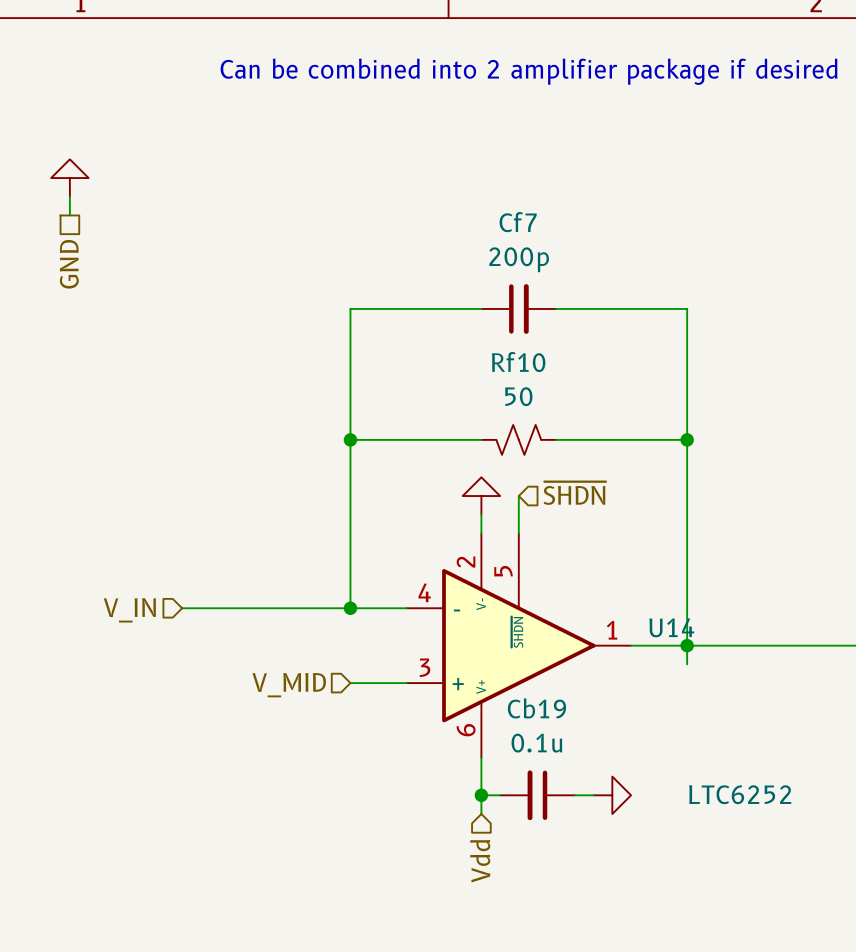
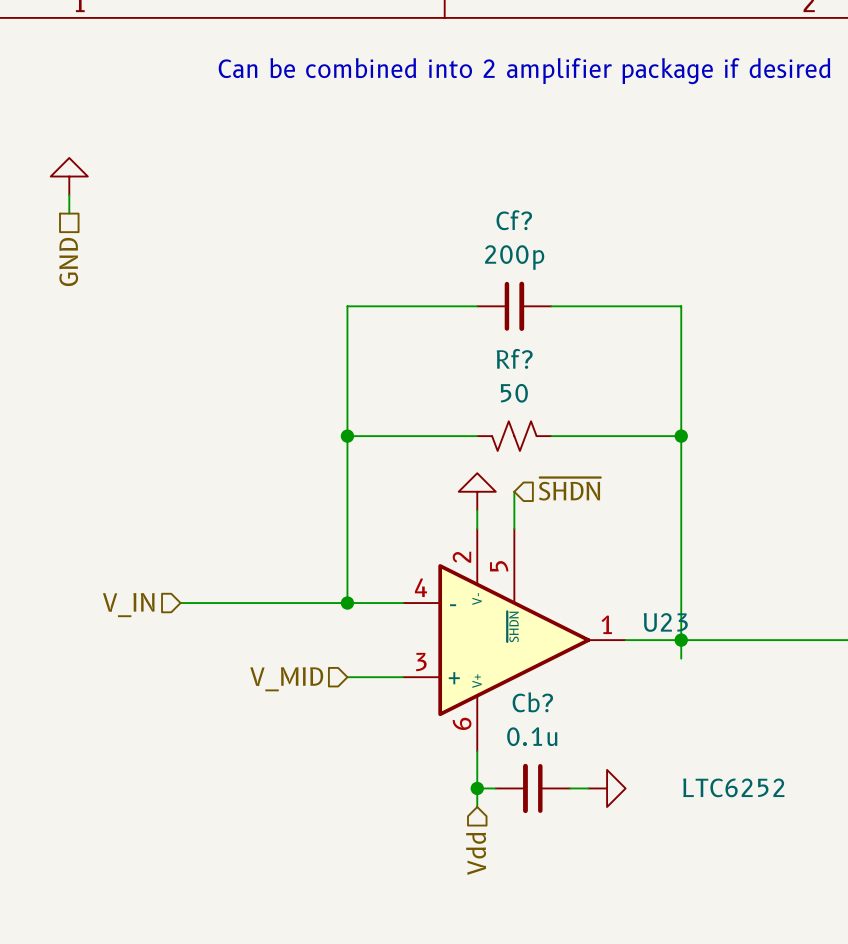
Cf7 name: Cf7 (518, 222) -> Cf? (514, 220)
Rf10 name: Rf10 (518, 362) -> Rf? (514, 358)
U14 name: U14 (671, 627) -> U23 (665, 622)
Cb19 name: Cb19 (536, 708) -> Cb? (532, 702)

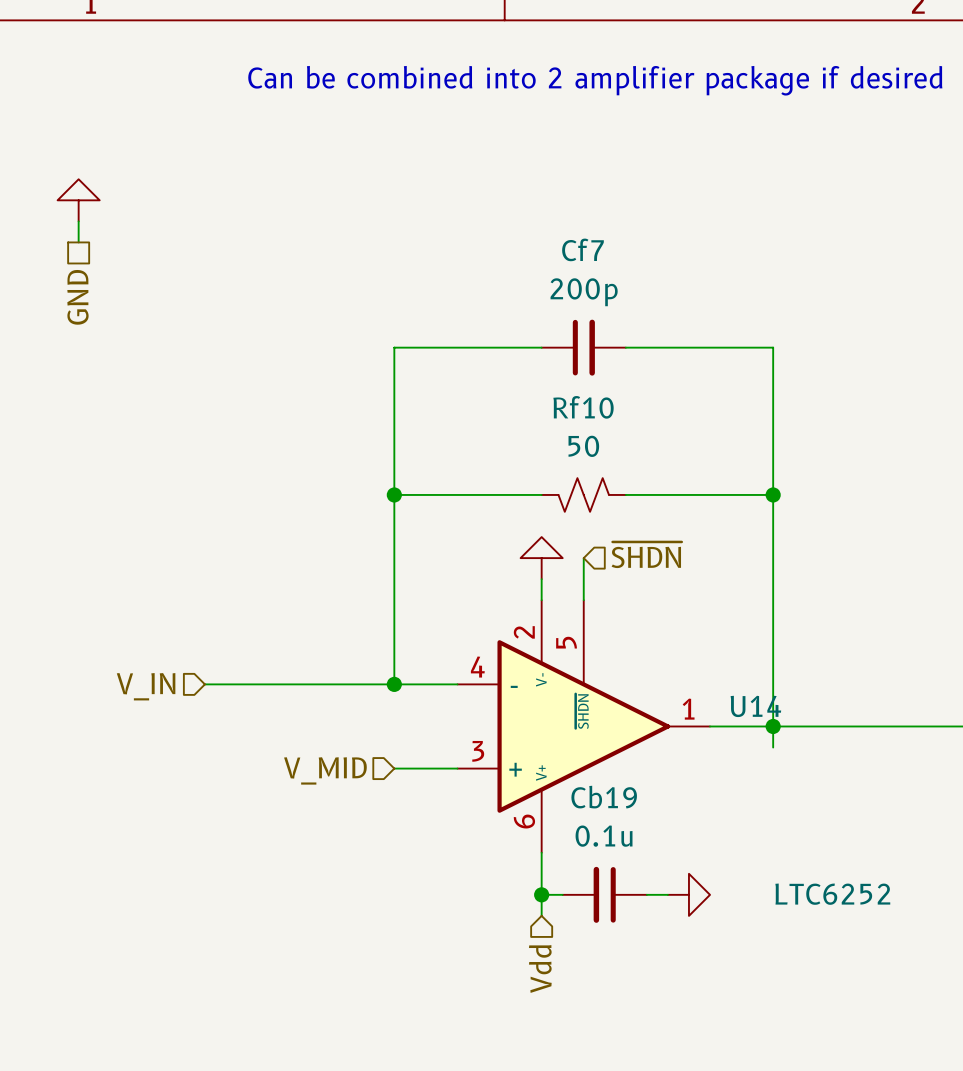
Cf? name: Cf? (514, 220) -> Cf7 (582, 249)
Rf? name: Rf? (514, 358) -> Rf10 (583, 407)
U23 name: U23 (665, 622) -> U14 (755, 706)
Cb? name: Cb? (532, 702) -> Cb19 (604, 797)

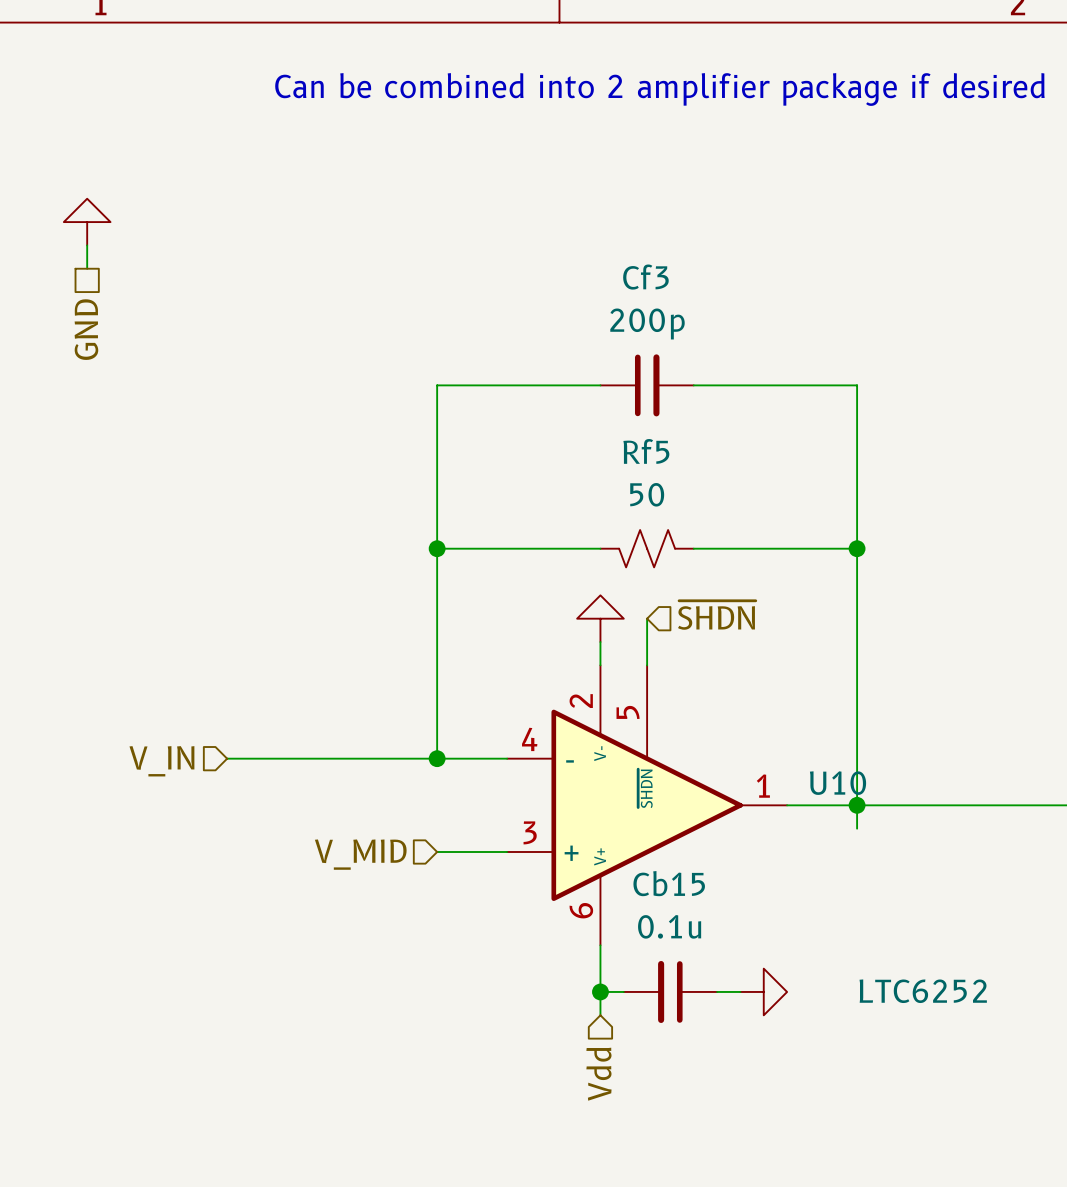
Cf7 name: Cf7 (582, 249) -> Cf3 (645, 277)
Rf10 name: Rf10 (583, 407) -> Rf5 (646, 451)
U14 name: U14 (755, 706) -> U10 (838, 783)
Cb19 name: Cb19 (604, 797) -> Cb15 (669, 883)

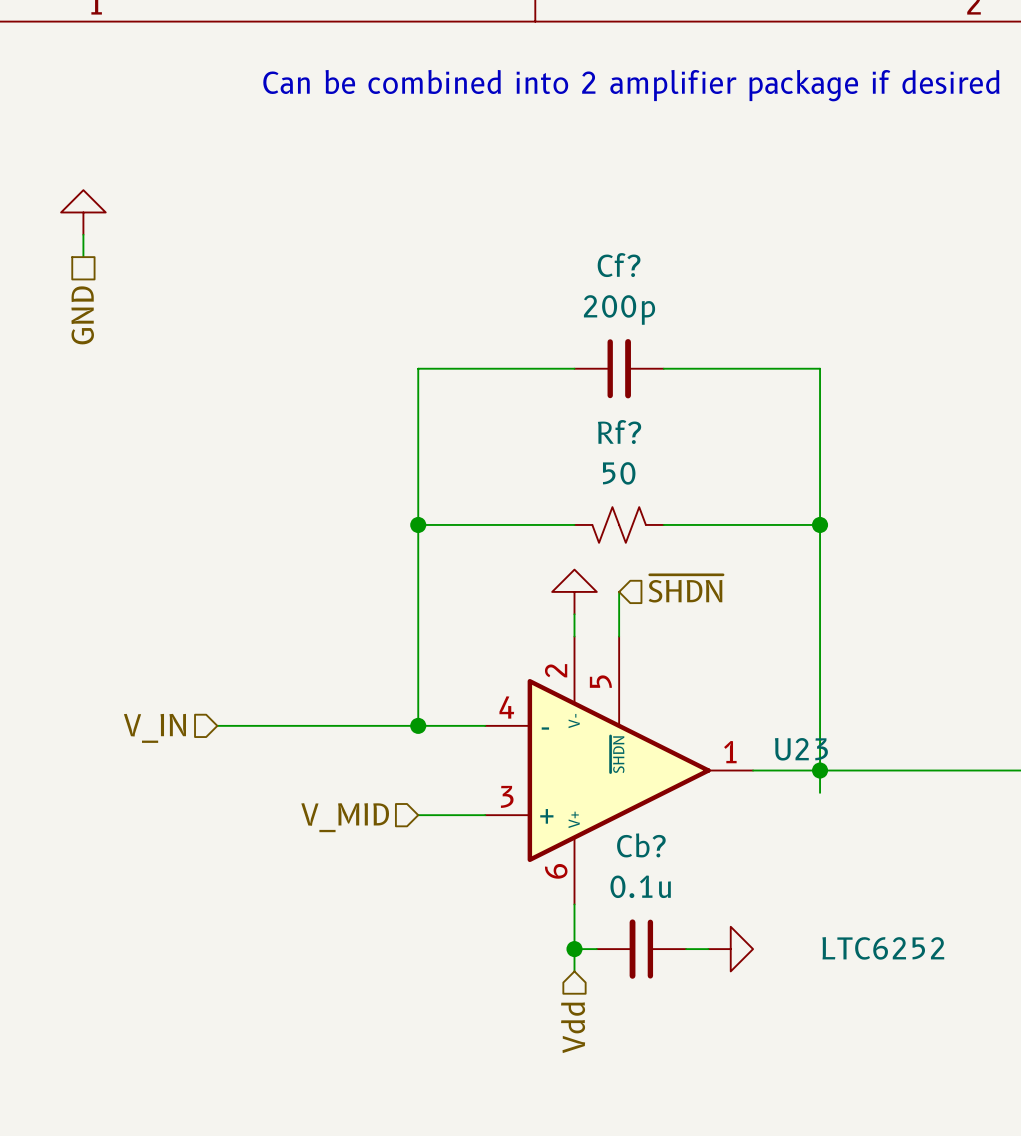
Cf3 name: Cf3 (645, 277) -> Cf? (619, 265)
Rf5 name: Rf5 (646, 451) -> Rf? (619, 432)
U10 name: U10 (838, 783) -> U23 (801, 749)
Cb15 name: Cb15 (669, 883) -> Cb? (641, 845)

